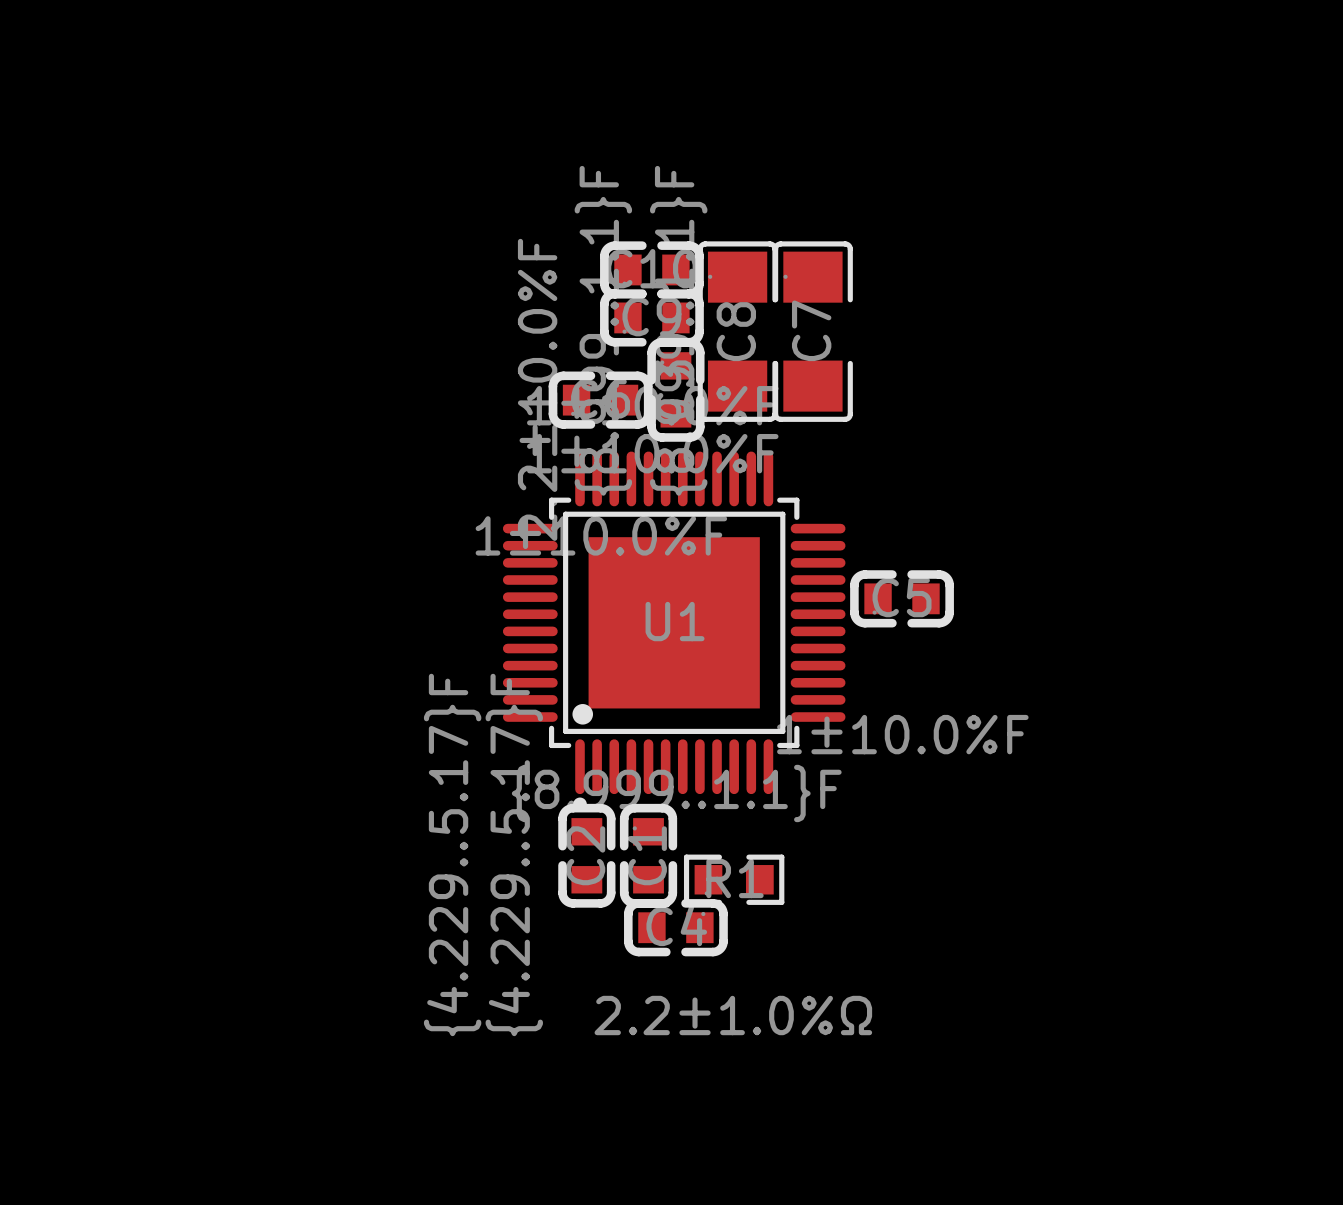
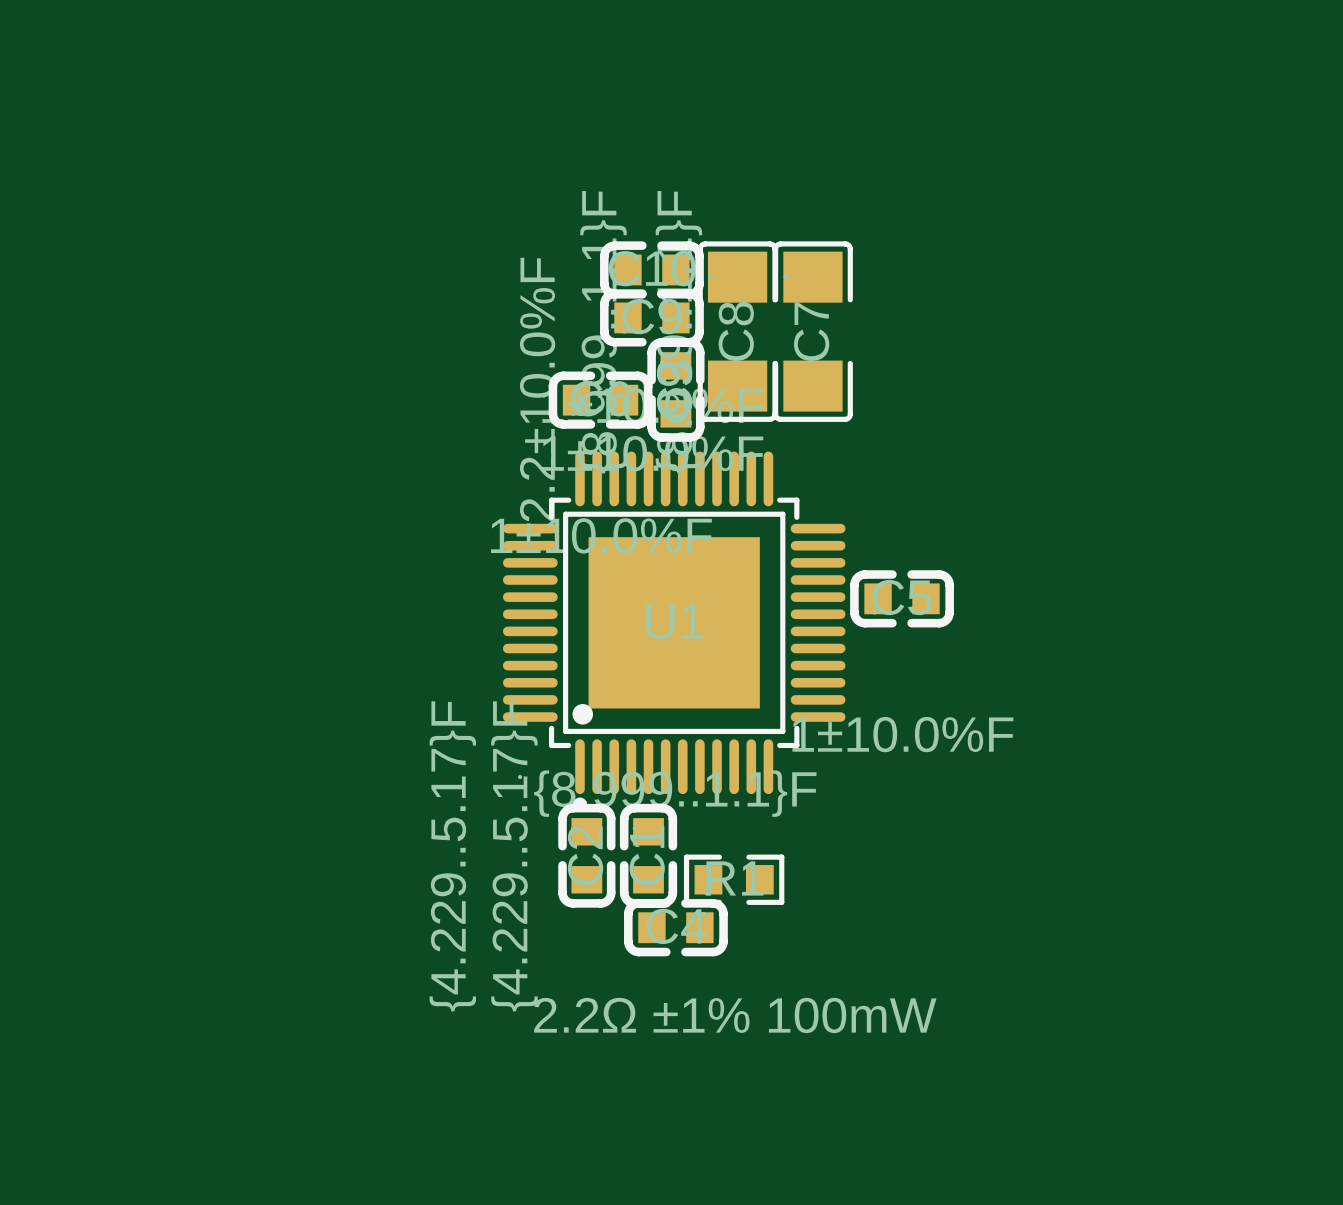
R1 value: 2.2±1.0%Ω (733, 1015) -> 2.2Ω ±1% 100mW (735, 1015)

